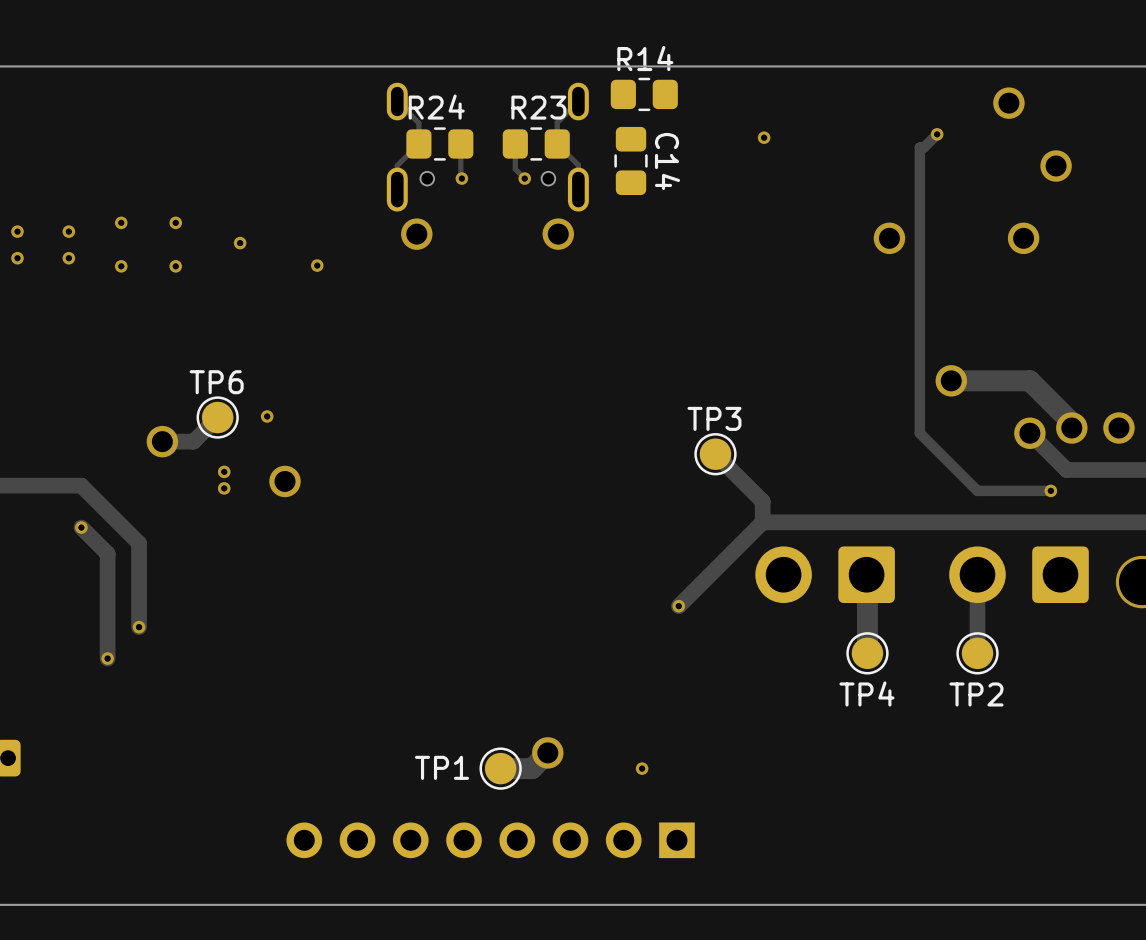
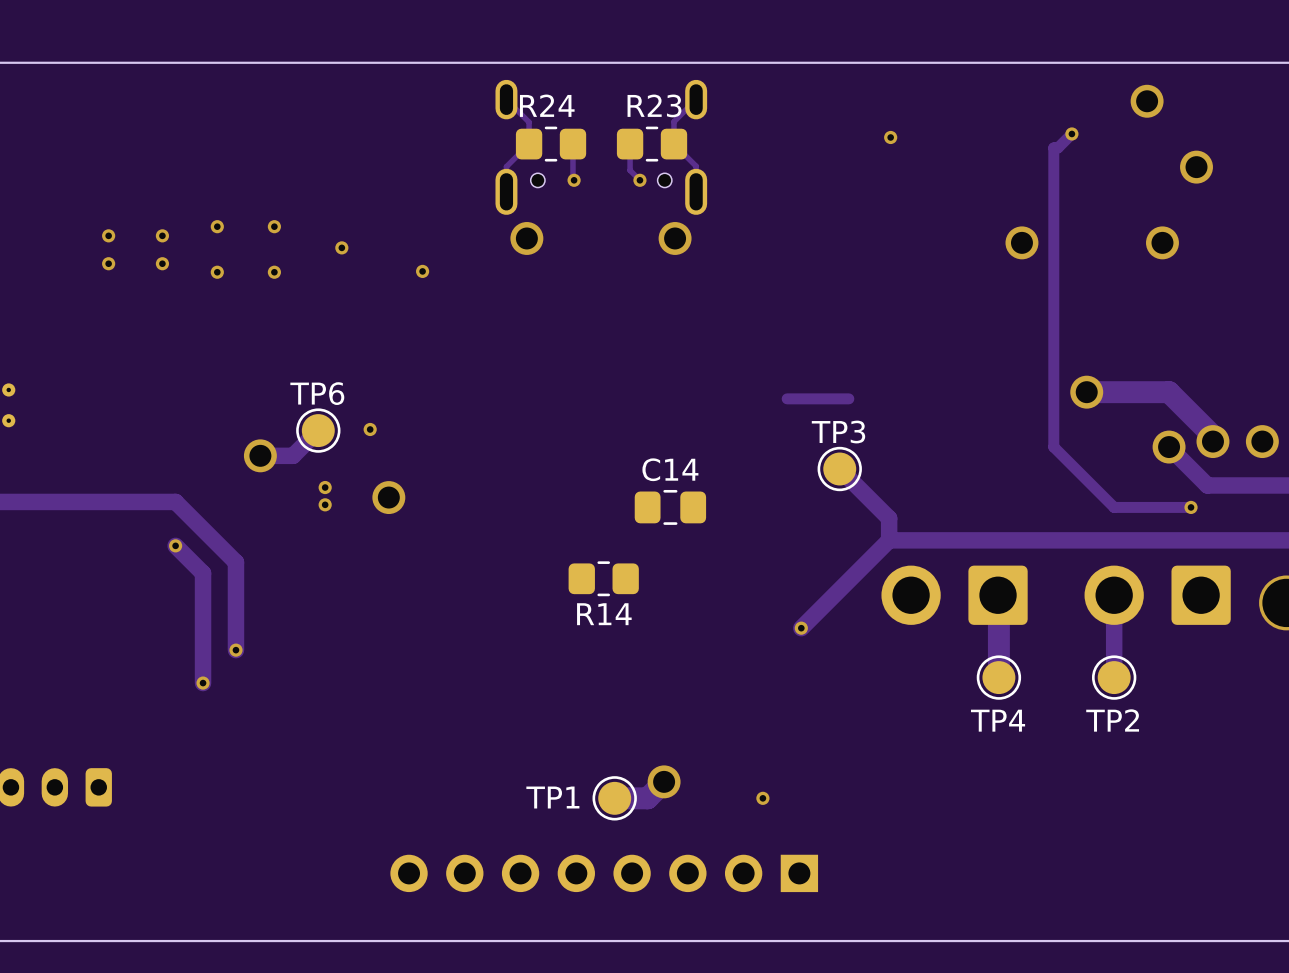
R14 name position: R14 (645, 58) -> R14 (604, 614)
R14 position: (644, 94) -> (603, 578)
C14 rotation: 0° (631, 160) -> 90° clockwise (670, 507)
C14 position: (631, 160) -> (670, 507)
C14 name position: C14 (667, 161) -> C14 (670, 469)
track: none -> (848, 398) (787, 398)

